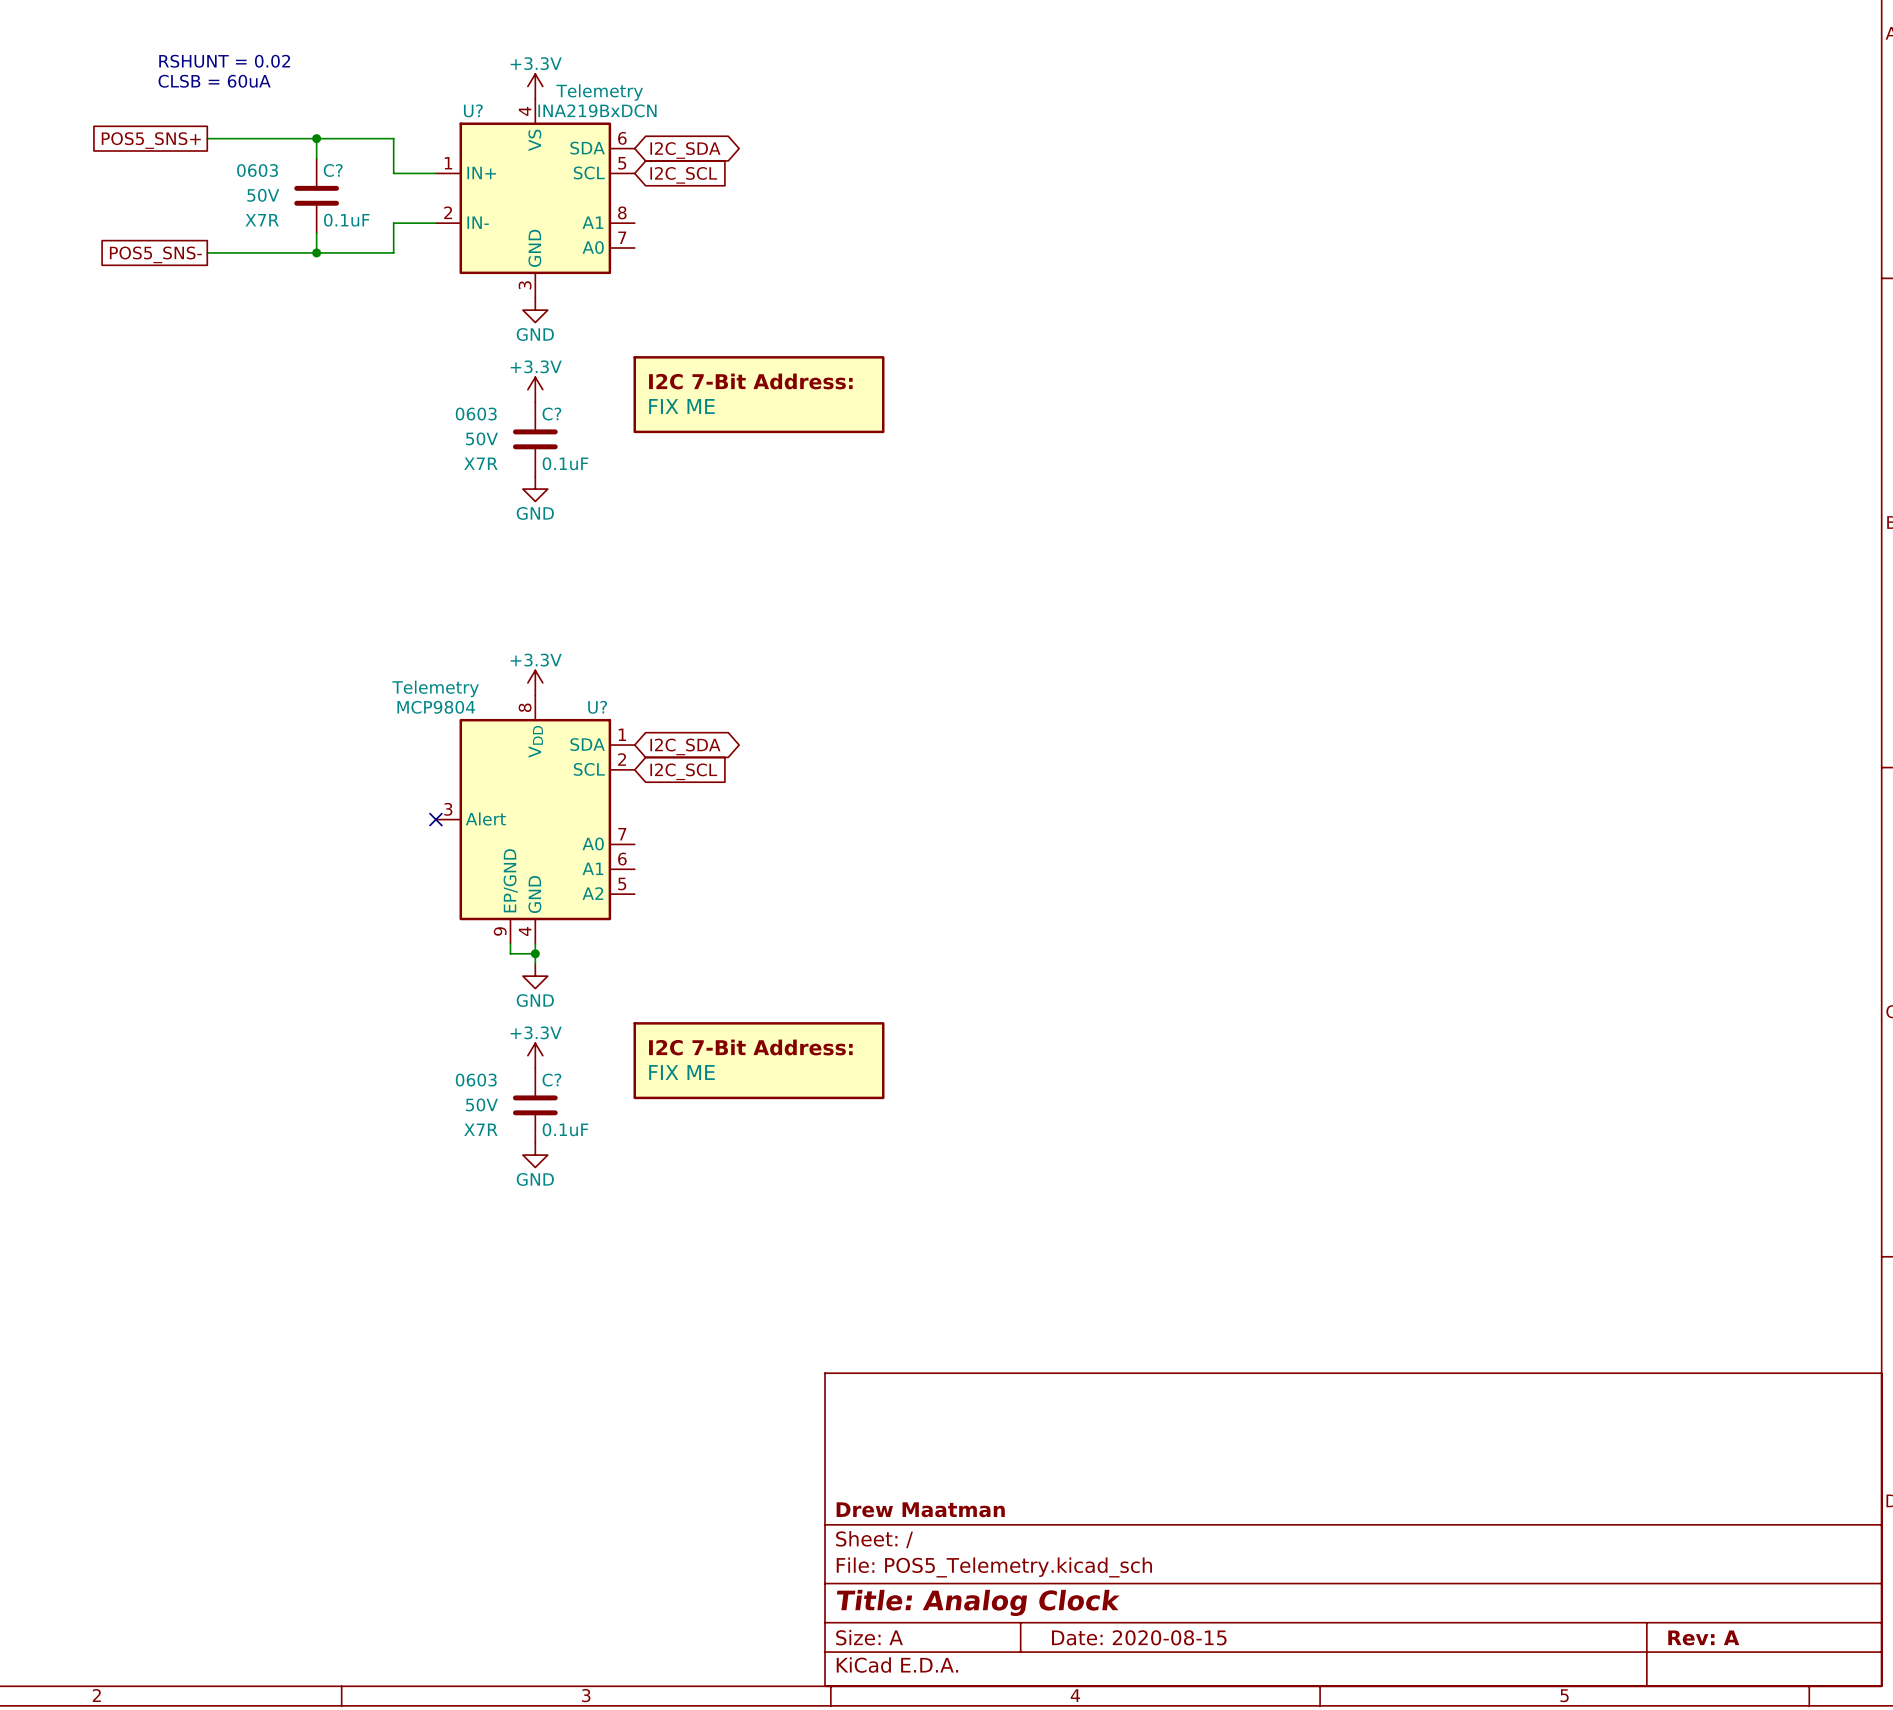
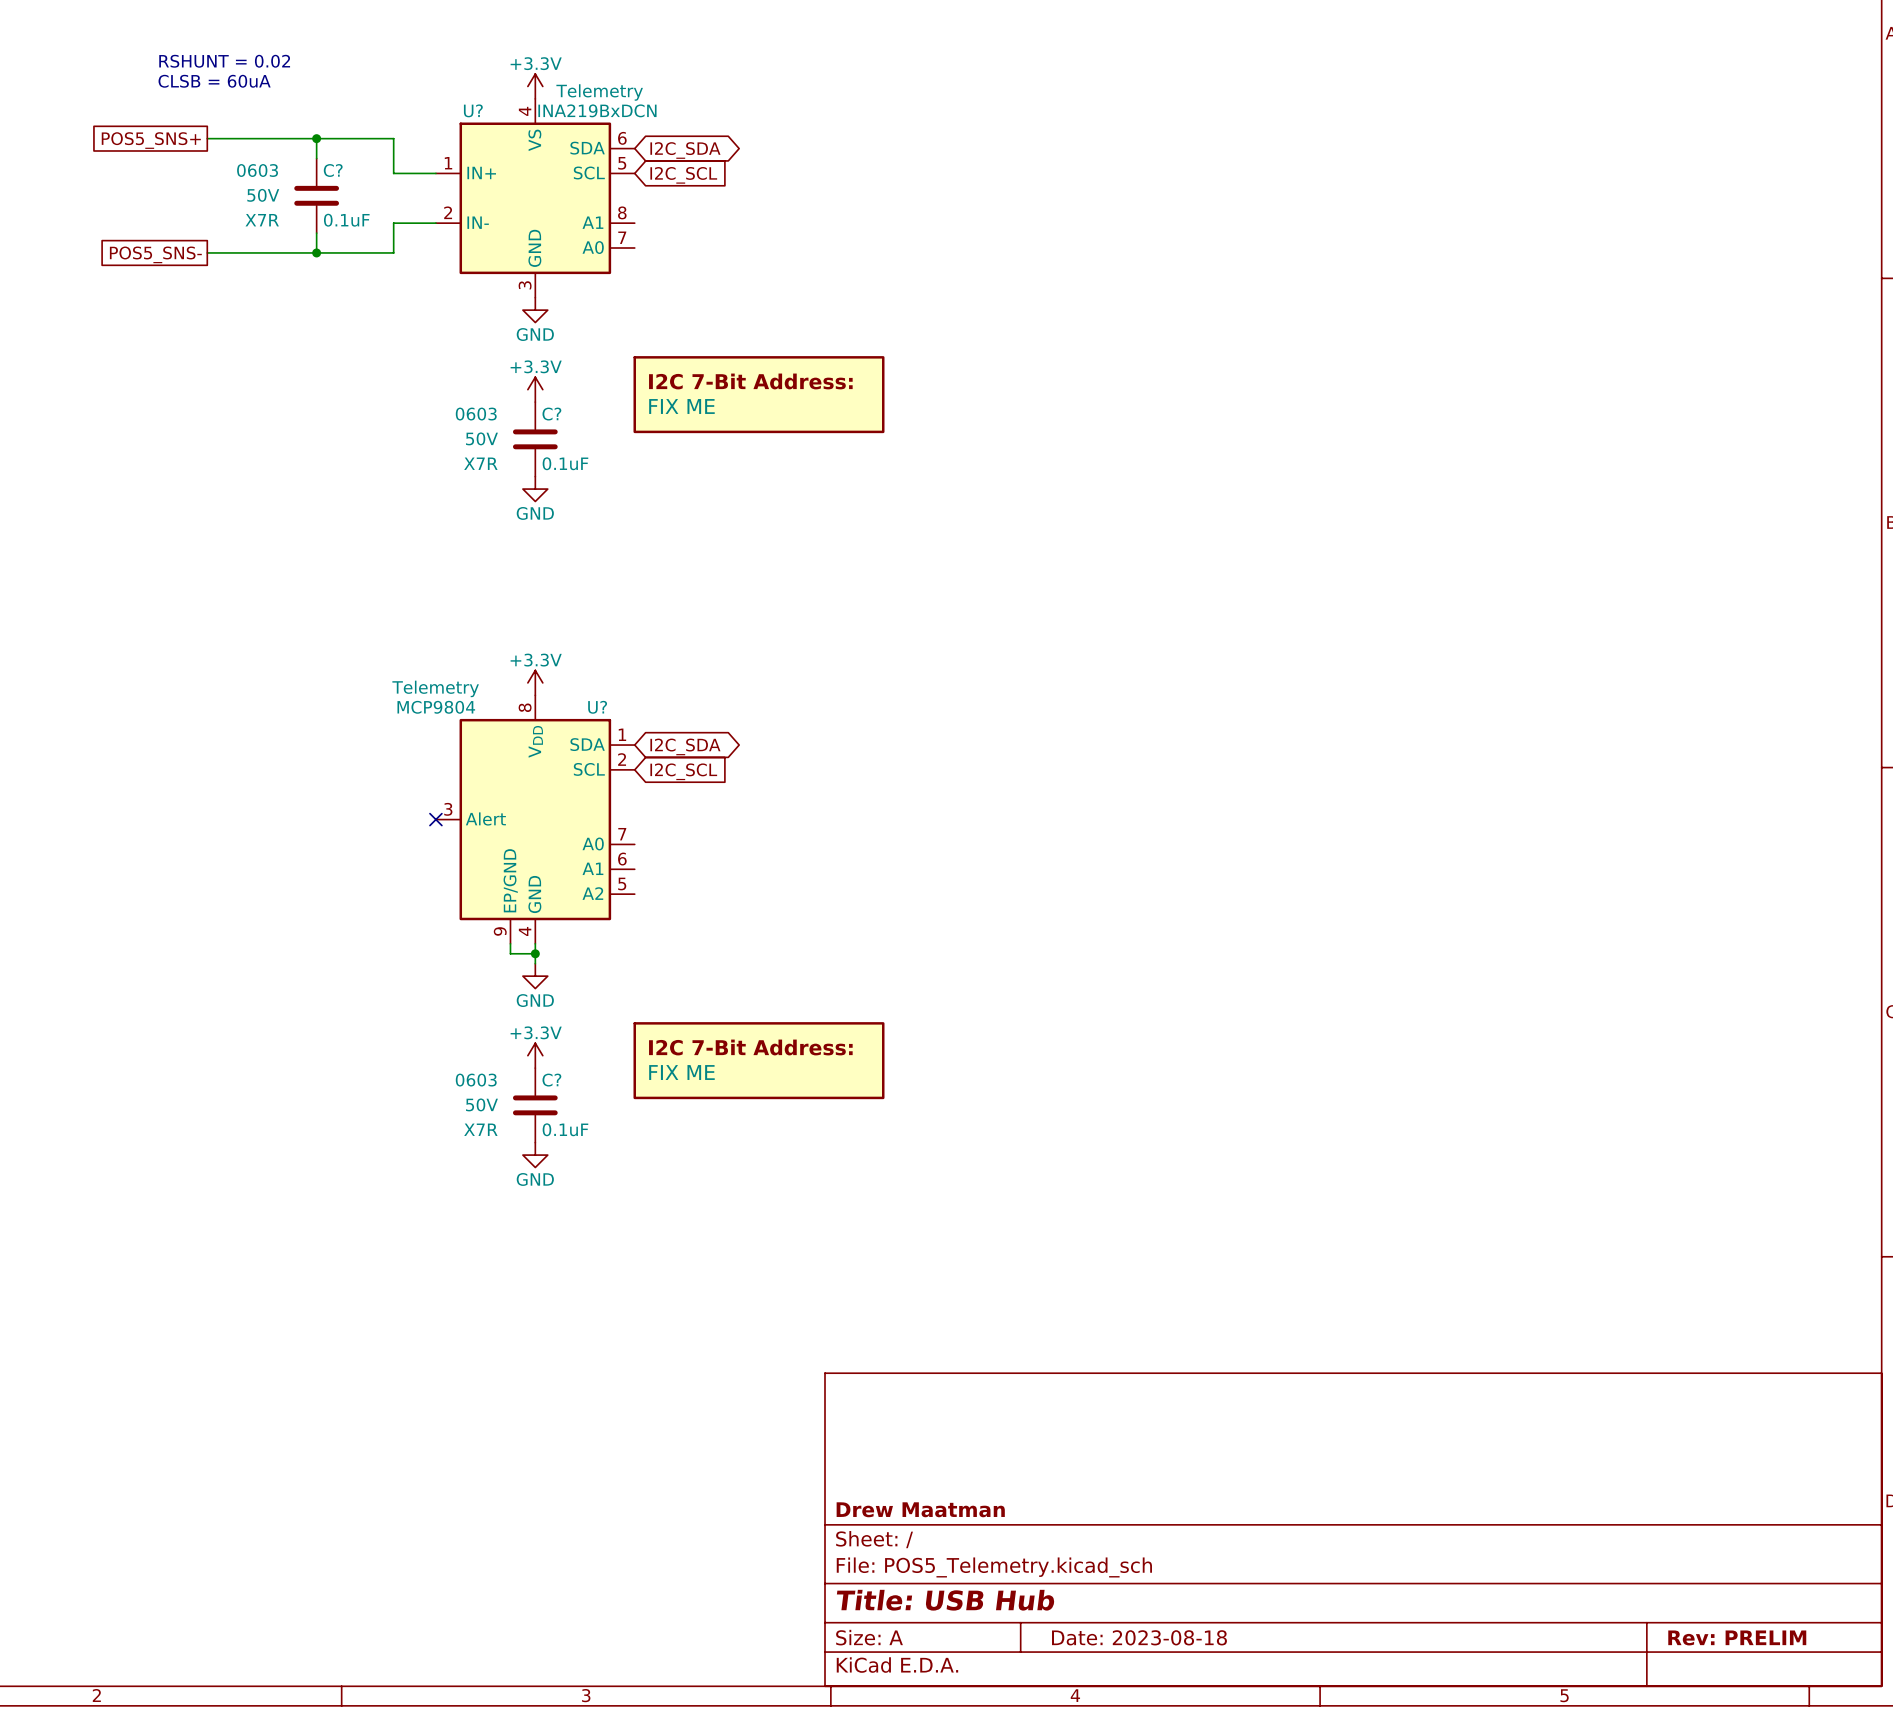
title block: Title: Analog Clock (978, 1602) -> Title: USB Hub (945, 1600)
title block: Date: 2020-08-15 (1139, 1637) -> Date: 2023-08-18 (1139, 1637)
title block: Rev: A (1703, 1637) -> Rev: PRELIM (1737, 1637)

